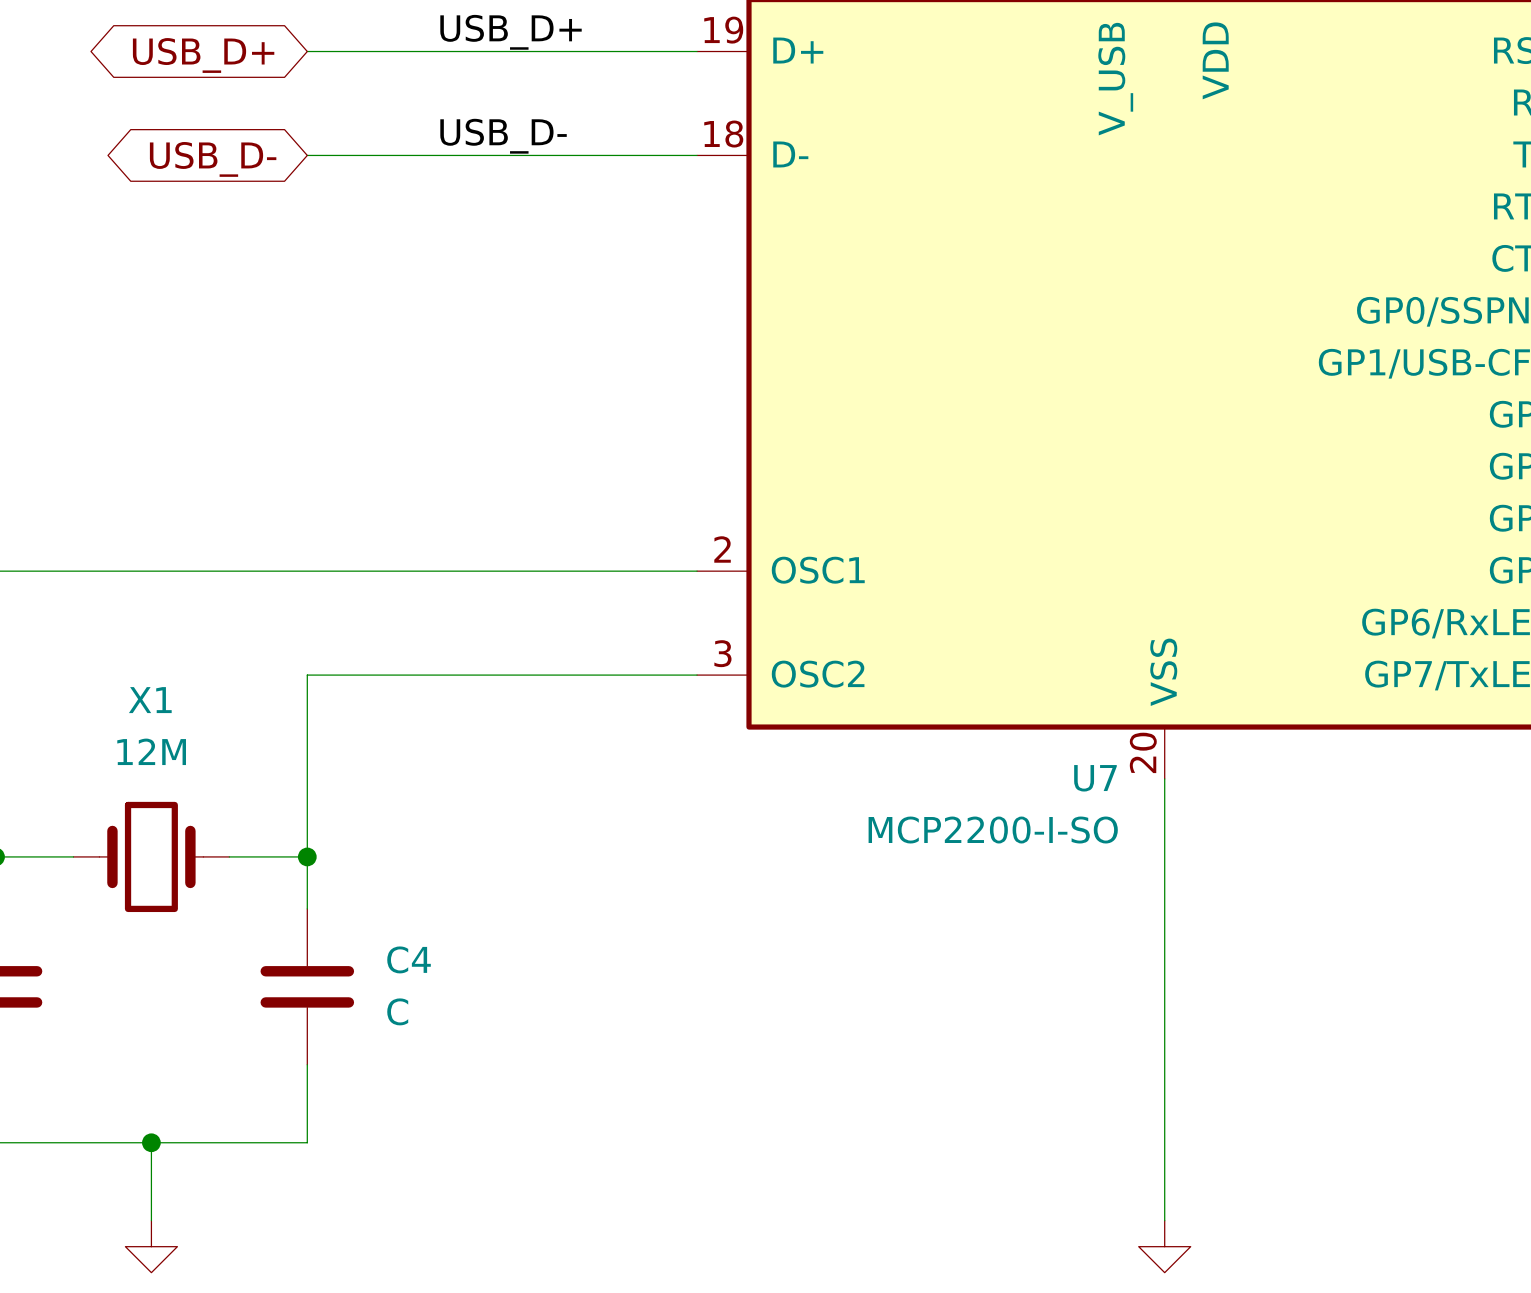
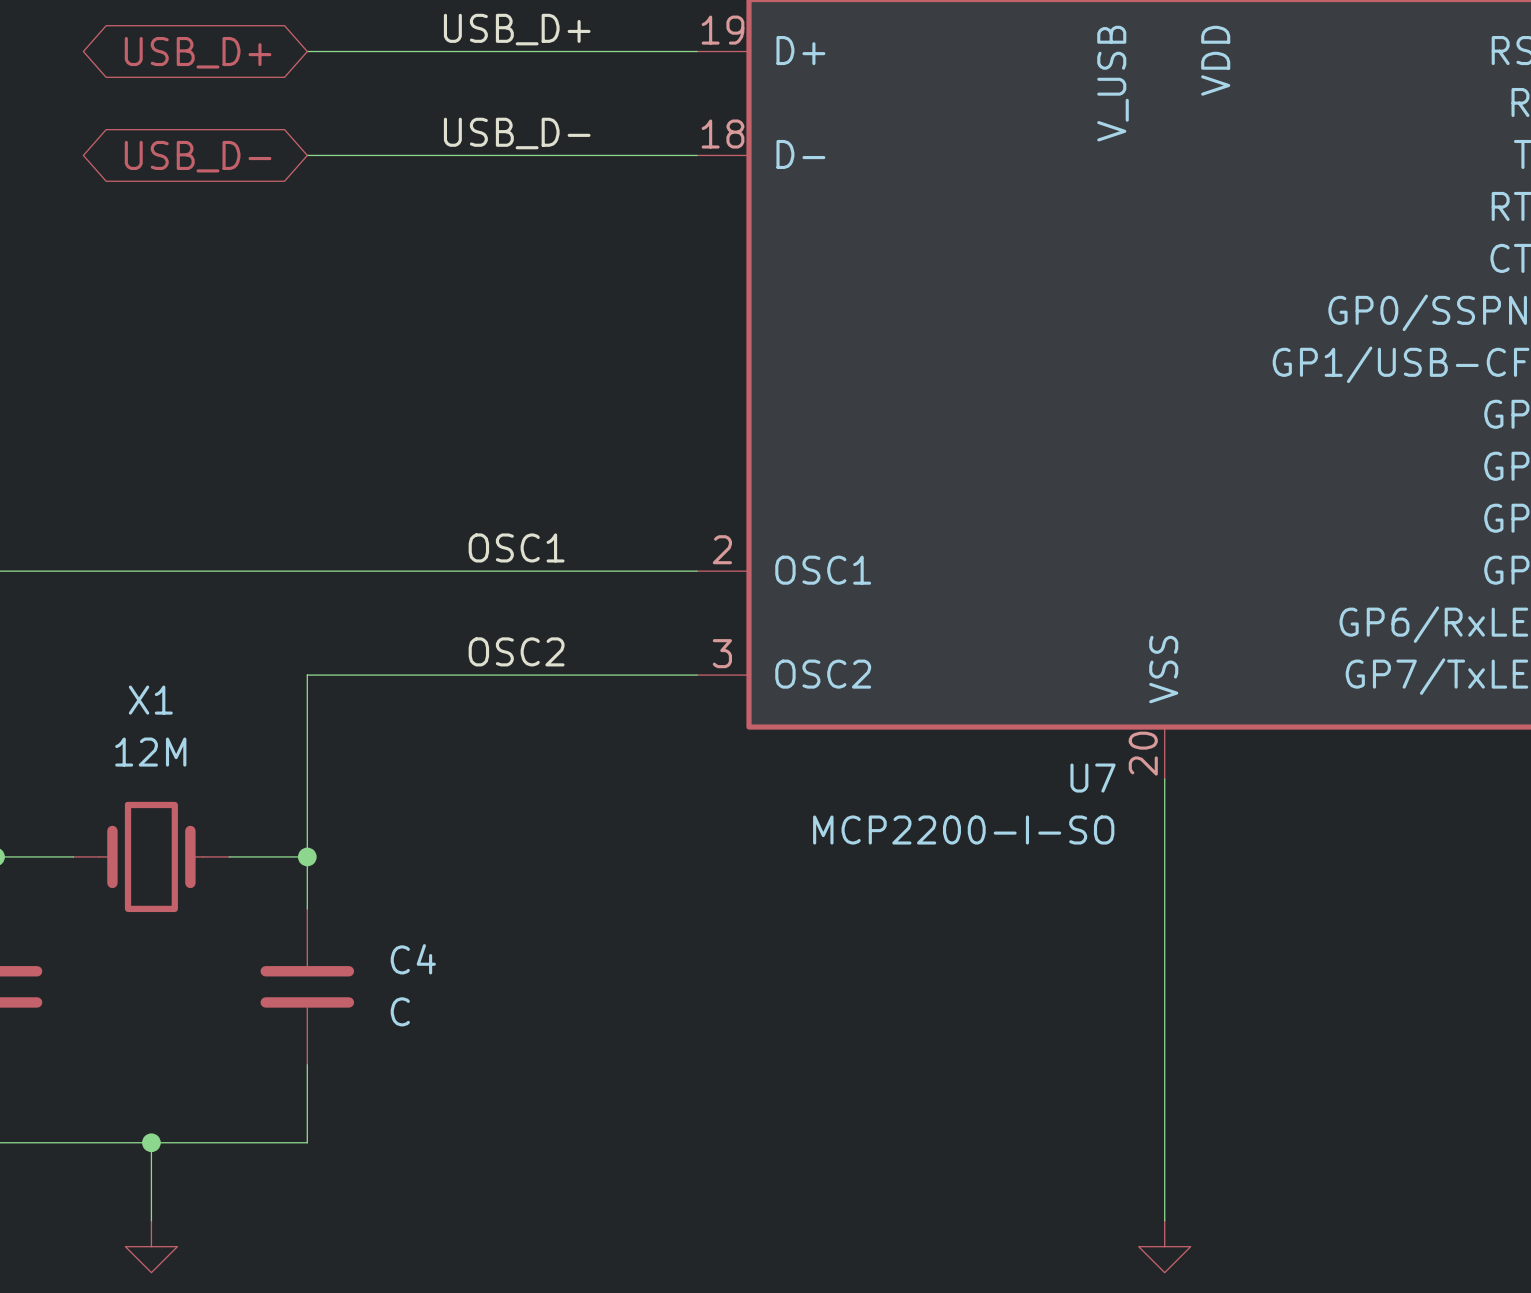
label: none -> OSC1 (516, 547)
label: none -> OSC2 (516, 651)

